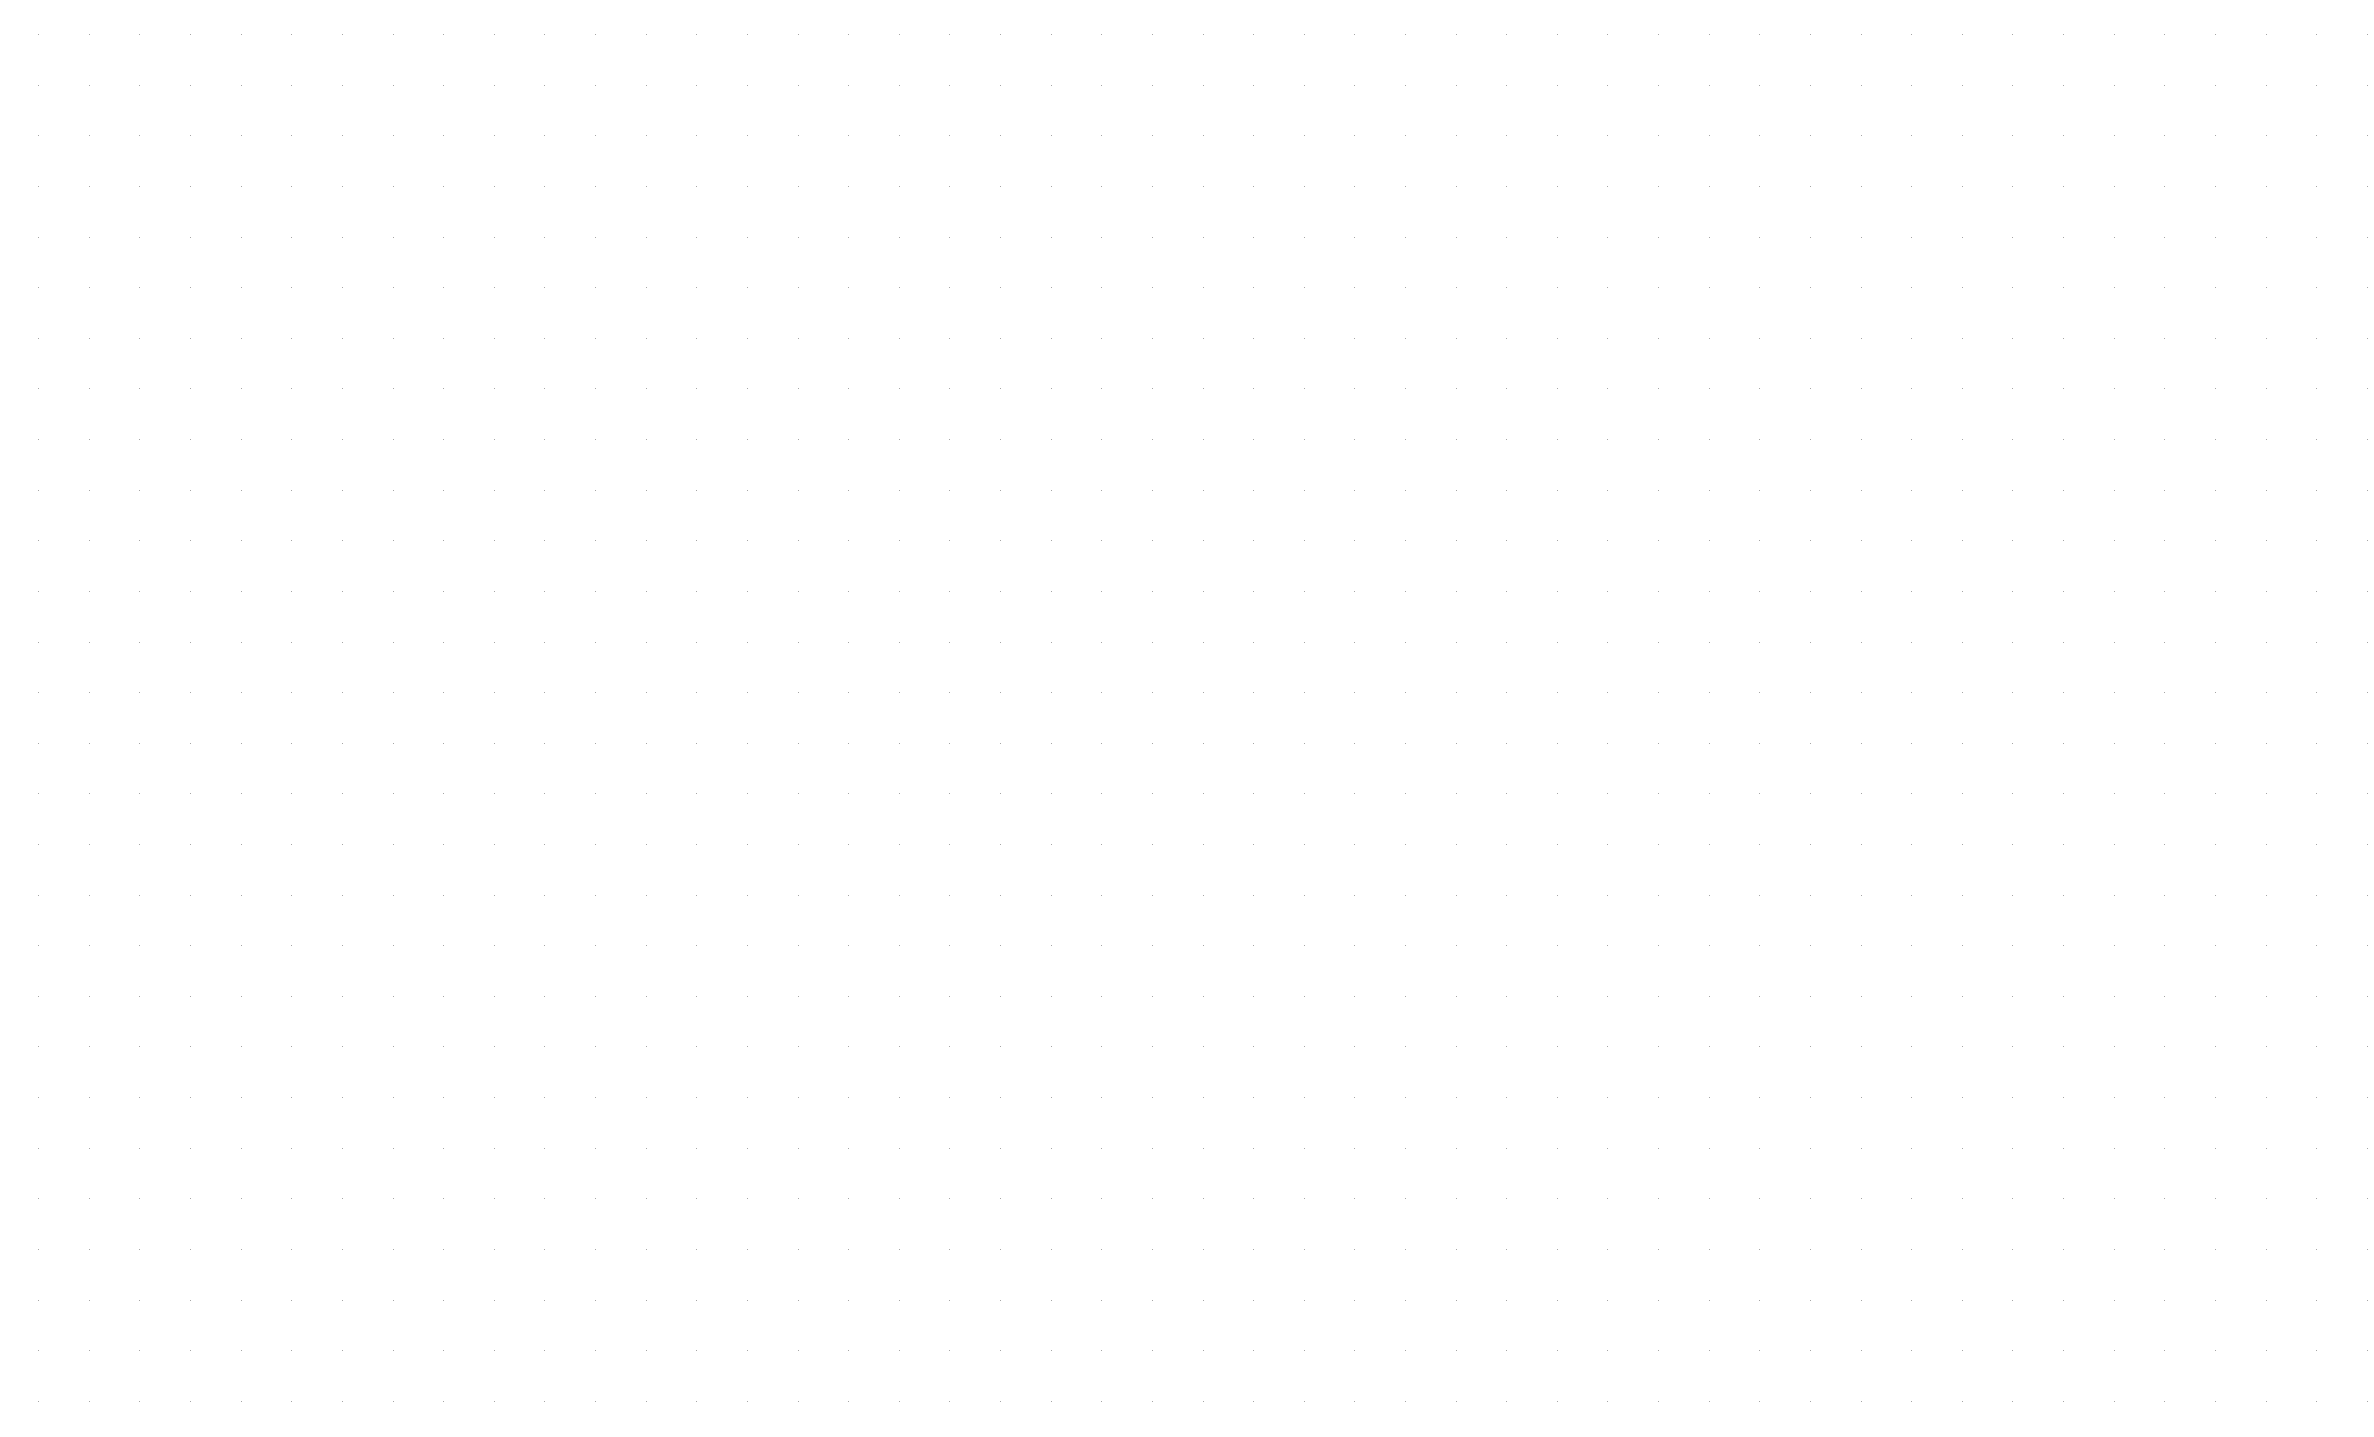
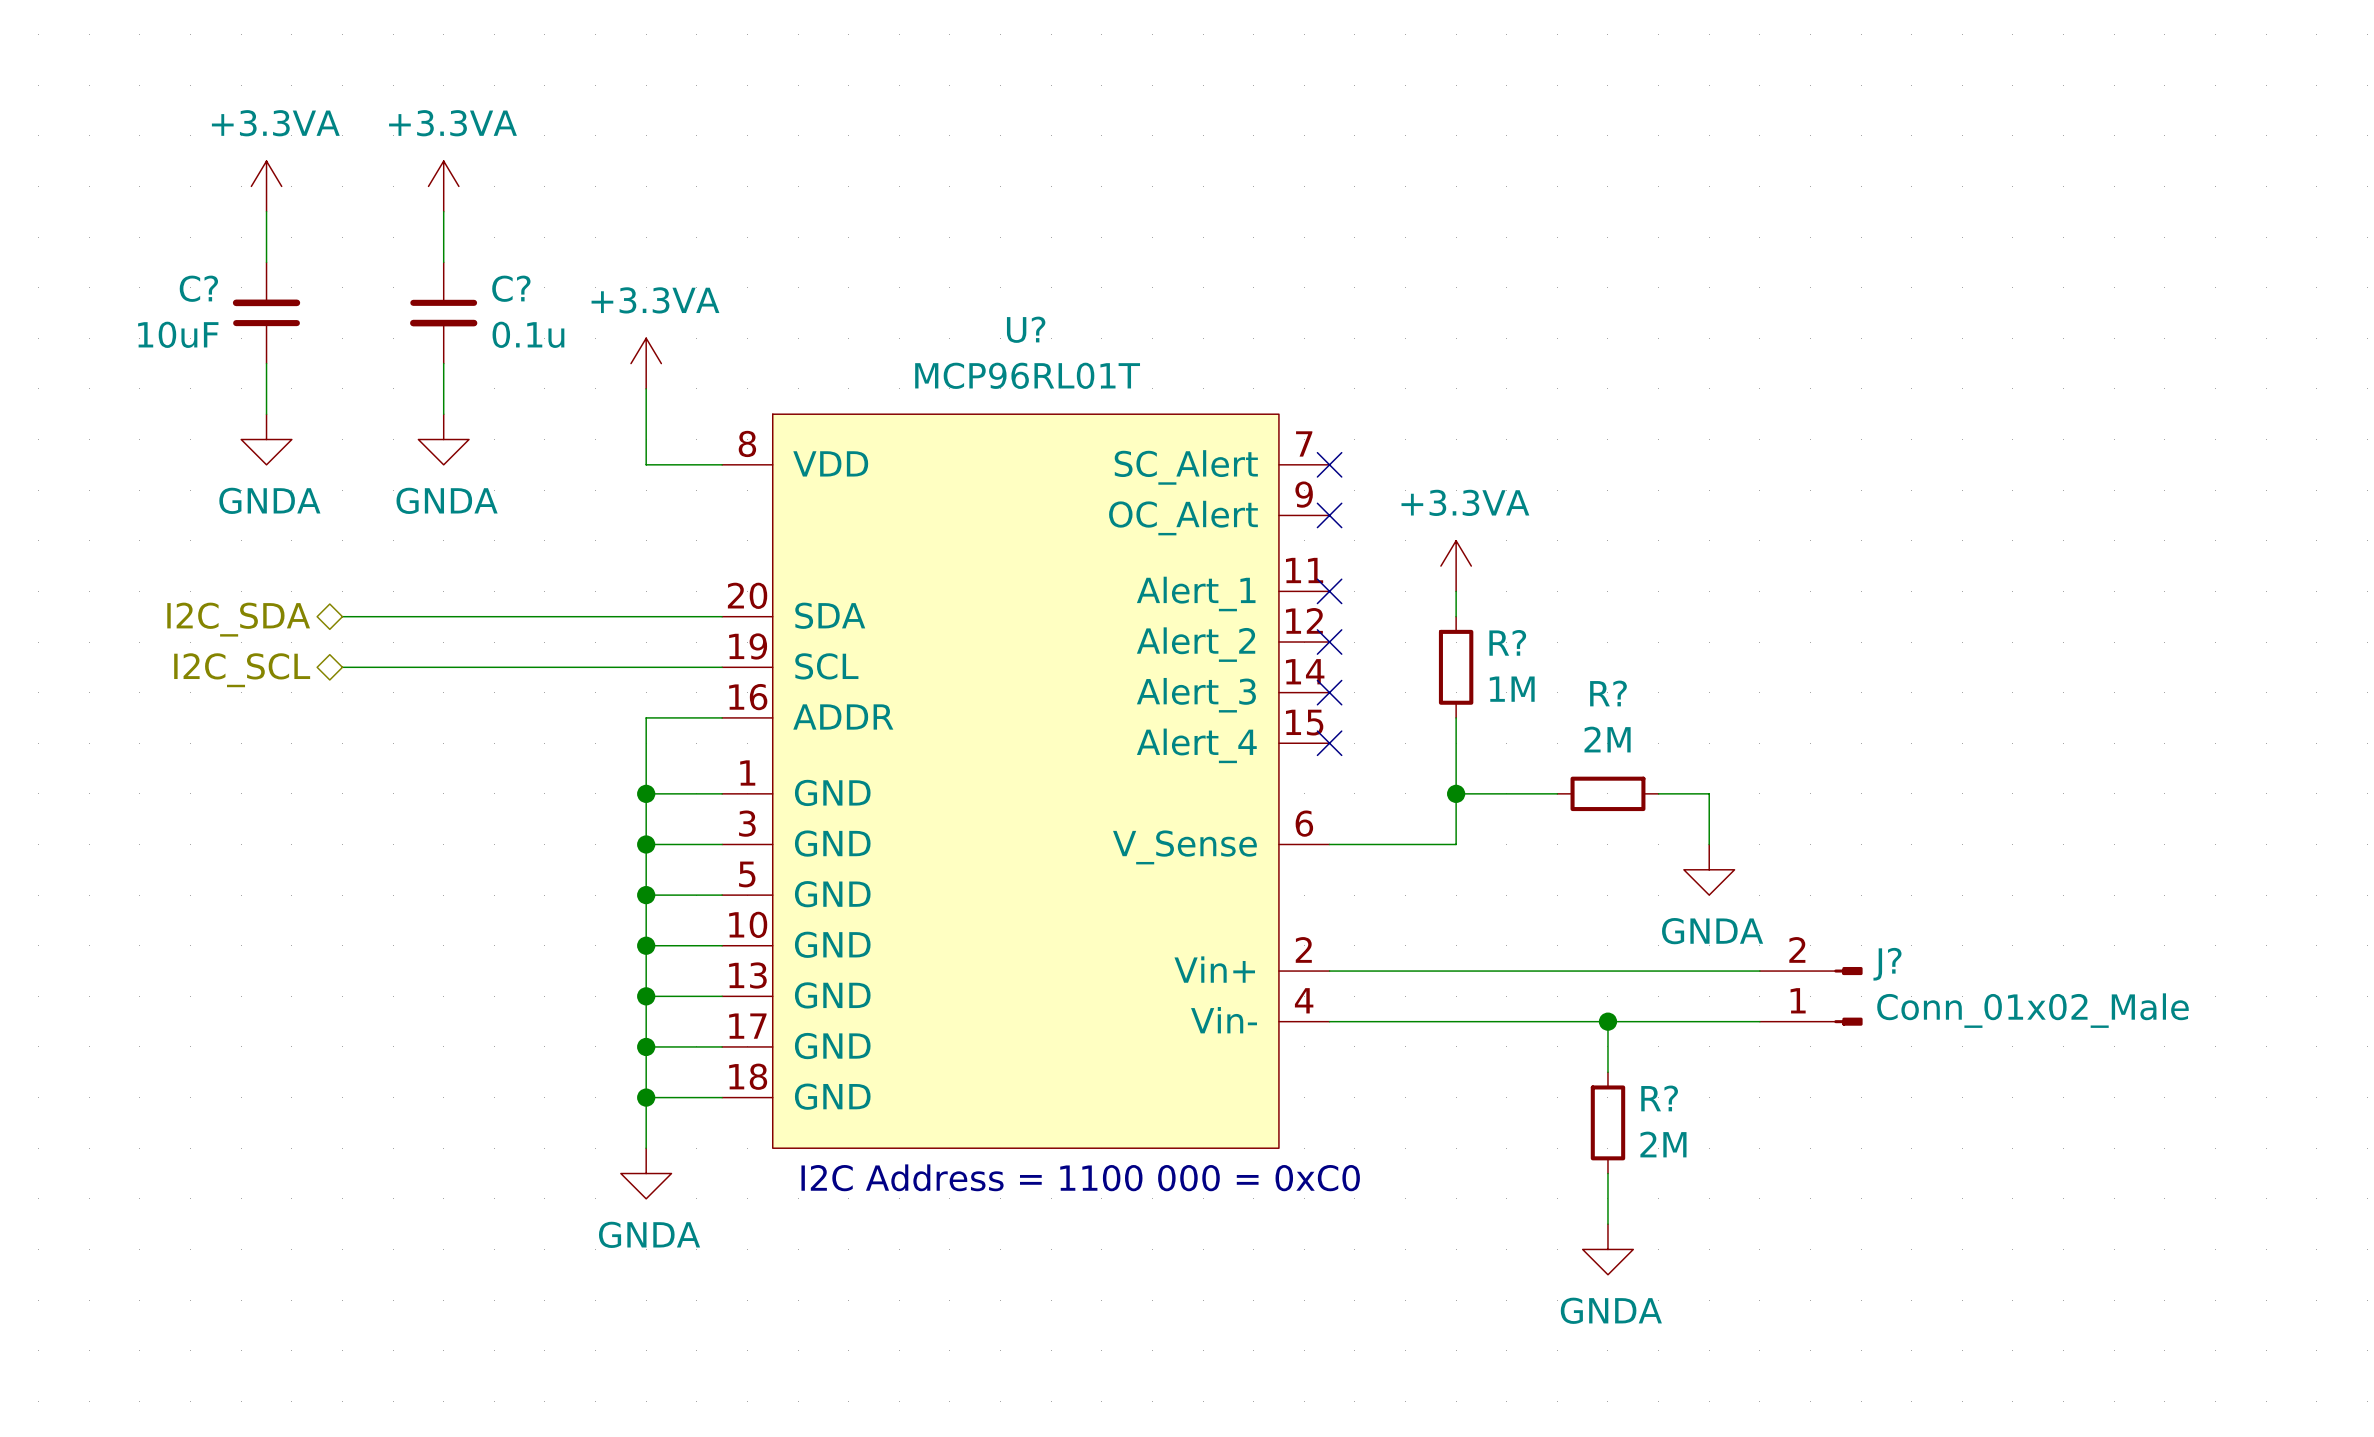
power symbol: none -> +3.3VA (266, 186)
power symbol: none -> +3.3VA (443, 186)
wire: none -> (266, 211) (266, 262)
wire: none -> (443, 211) (443, 262)
C?: none -> 10uF (266, 312)
C?: none -> 0.1u (443, 312)
wire: none -> (266, 363) (266, 414)
wire: none -> (443, 363) (443, 414)
power symbol: none -> +3.3VA (646, 363)
wire: none -> (646, 388) (646, 464) (722, 464)
power symbol: none -> GNDA (266, 439)
power symbol: none -> GNDA (443, 439)
no-connect mark: none -> (1329, 464)
no-connect mark: none -> (1329, 515)
power symbol: none -> +3.3VA (1456, 566)
no-connect mark: none -> (1329, 591)
wire: none -> (1456, 591) (1456, 616)
wire: none -> (342, 616) (722, 616)
hierarchical label: none -> I2C_SDA (238, 619)
no-connect mark: none -> (1329, 642)
wire: none -> (342, 667) (722, 667)
R?: none -> 1M (1456, 667)
hierarchical label: none -> I2C_SCL (242, 670)
no-connect mark: none -> (1329, 692)
wire: none -> (722, 717) (646, 717) (646, 1148)
wire: none -> (1456, 717) (1456, 844) (1329, 844)
no-connect mark: none -> (1329, 743)
U?: none -> MCP96RL01T (1025, 781)
wire: none -> (646, 793) (722, 793)
junction: none -> (646, 793)
wire: none -> (1456, 793) (1557, 793)
junction: none -> (1456, 793)
R?: none -> 2M (1607, 793)
wire: none -> (1658, 793) (1709, 793) (1709, 844)
wire: none -> (646, 844) (722, 844)
junction: none -> (646, 844)
power symbol: none -> GNDA (1709, 869)
wire: none -> (646, 895) (722, 895)
junction: none -> (646, 895)
wire: none -> (646, 945) (722, 945)
junction: none -> (646, 945)
wire: none -> (1329, 971) (1759, 971)
wire: none -> (646, 996) (722, 996)
junction: none -> (646, 996)
J?: none -> Conn_01x02_Male (1811, 996)
wire: none -> (1329, 1021) (1759, 1021)
wire: none -> (1607, 1021) (1607, 1072)
junction: none -> (1607, 1021)
wire: none -> (646, 1046) (722, 1046)
junction: none -> (646, 1046)
wire: none -> (646, 1097) (722, 1097)
junction: none -> (646, 1097)
R?: none -> 2M (1607, 1122)
power symbol: none -> GNDA (646, 1173)
wire: none -> (1607, 1173) (1607, 1224)
text: none -> I2C Address = 1100 000 = 0xC0 (1080, 1177)
power symbol: none -> GNDA (1607, 1249)

